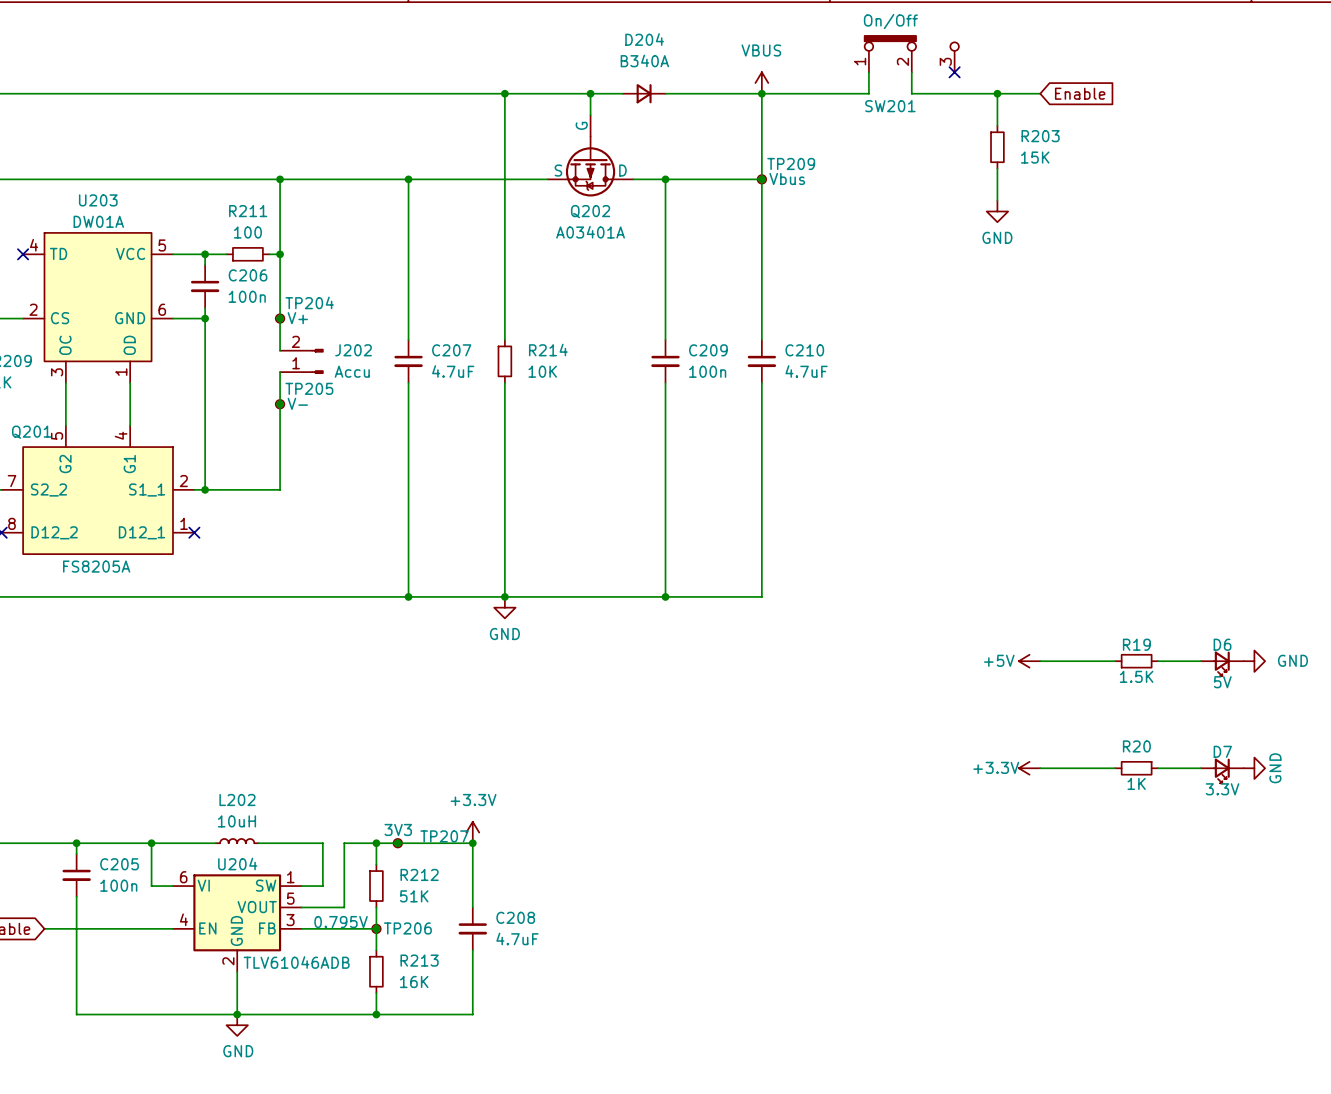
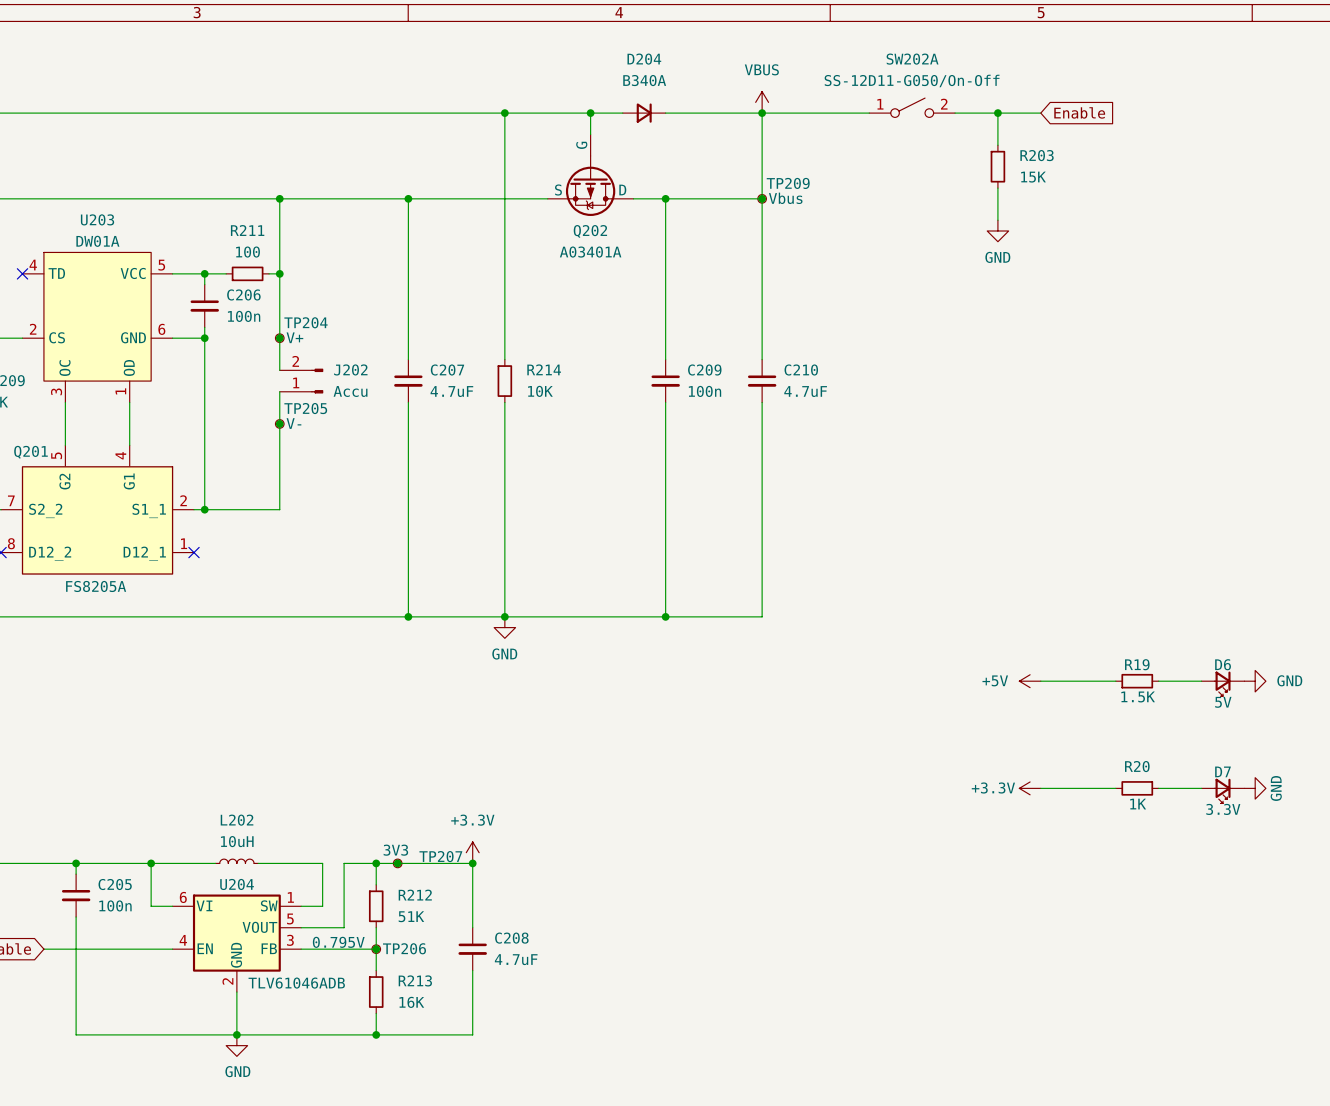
SW201: On/Off (911, 54) -> none
wire: (868, 72) (868, 93) -> none
wire: (911, 72) (911, 93) (954, 93) -> none
no-connect mark: (954, 72) -> none
SW202A: none -> SS-12D11-G050/On-Off (912, 107)

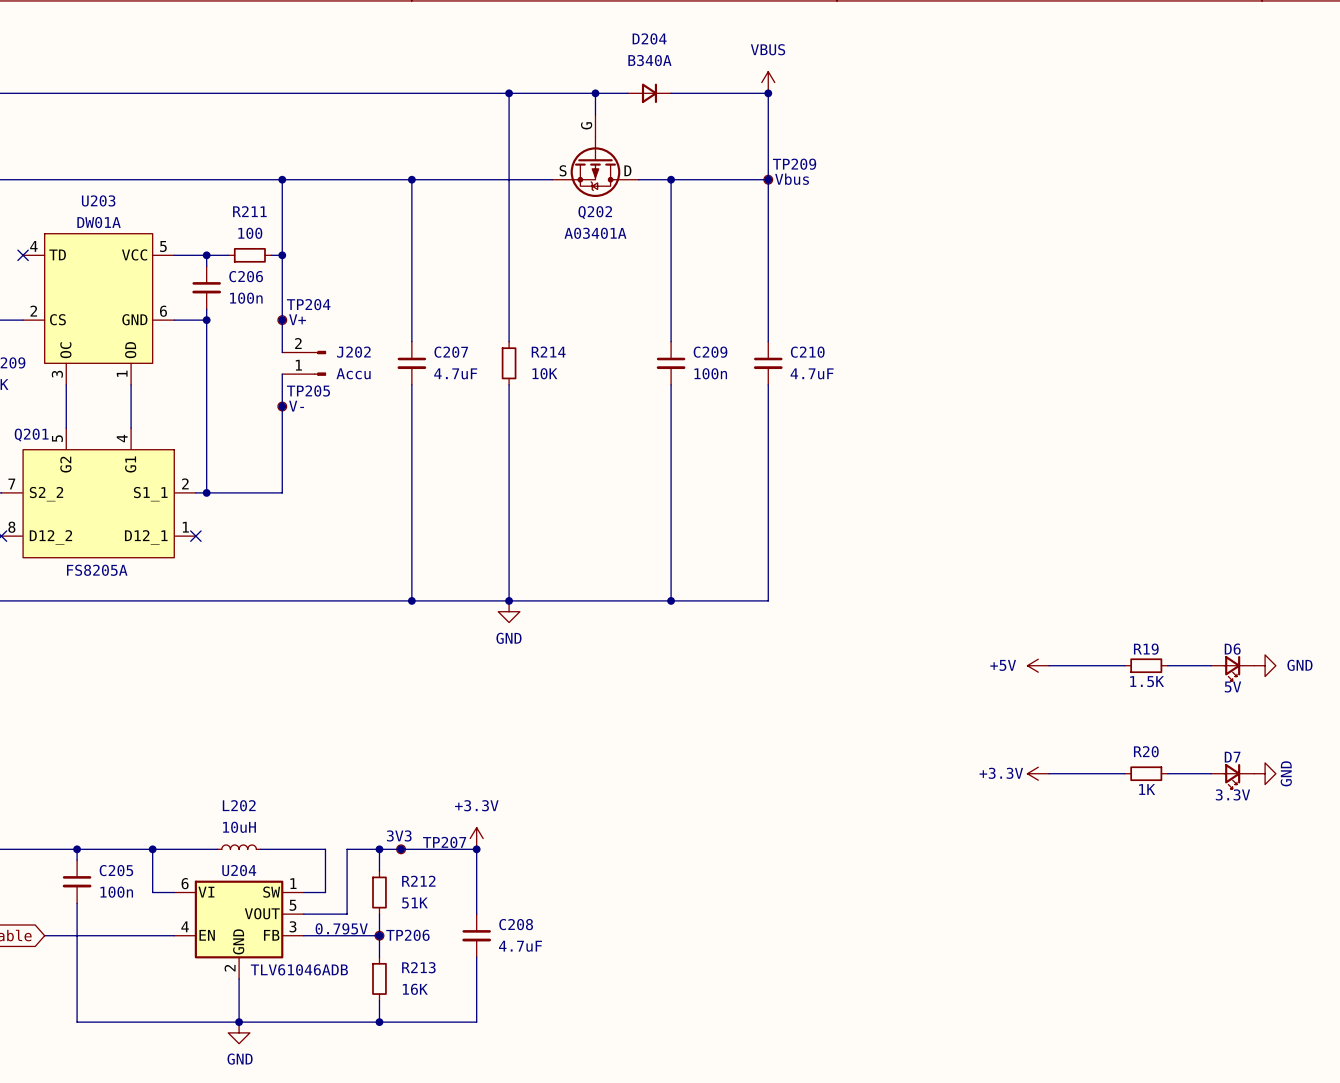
SW202A: SS-12D11-G050/On-Off (912, 107) -> none
global label: Enable (1079, 112) -> none
wire: (762, 113) (869, 113) -> none
wire: (955, 113) (1040, 113) -> none
wire: (997, 113) (997, 145) -> none
junction: (997, 113) -> none
R203: 15K (997, 166) -> none
wire: (997, 188) (997, 220) -> none
power symbol: GND (997, 231) -> none

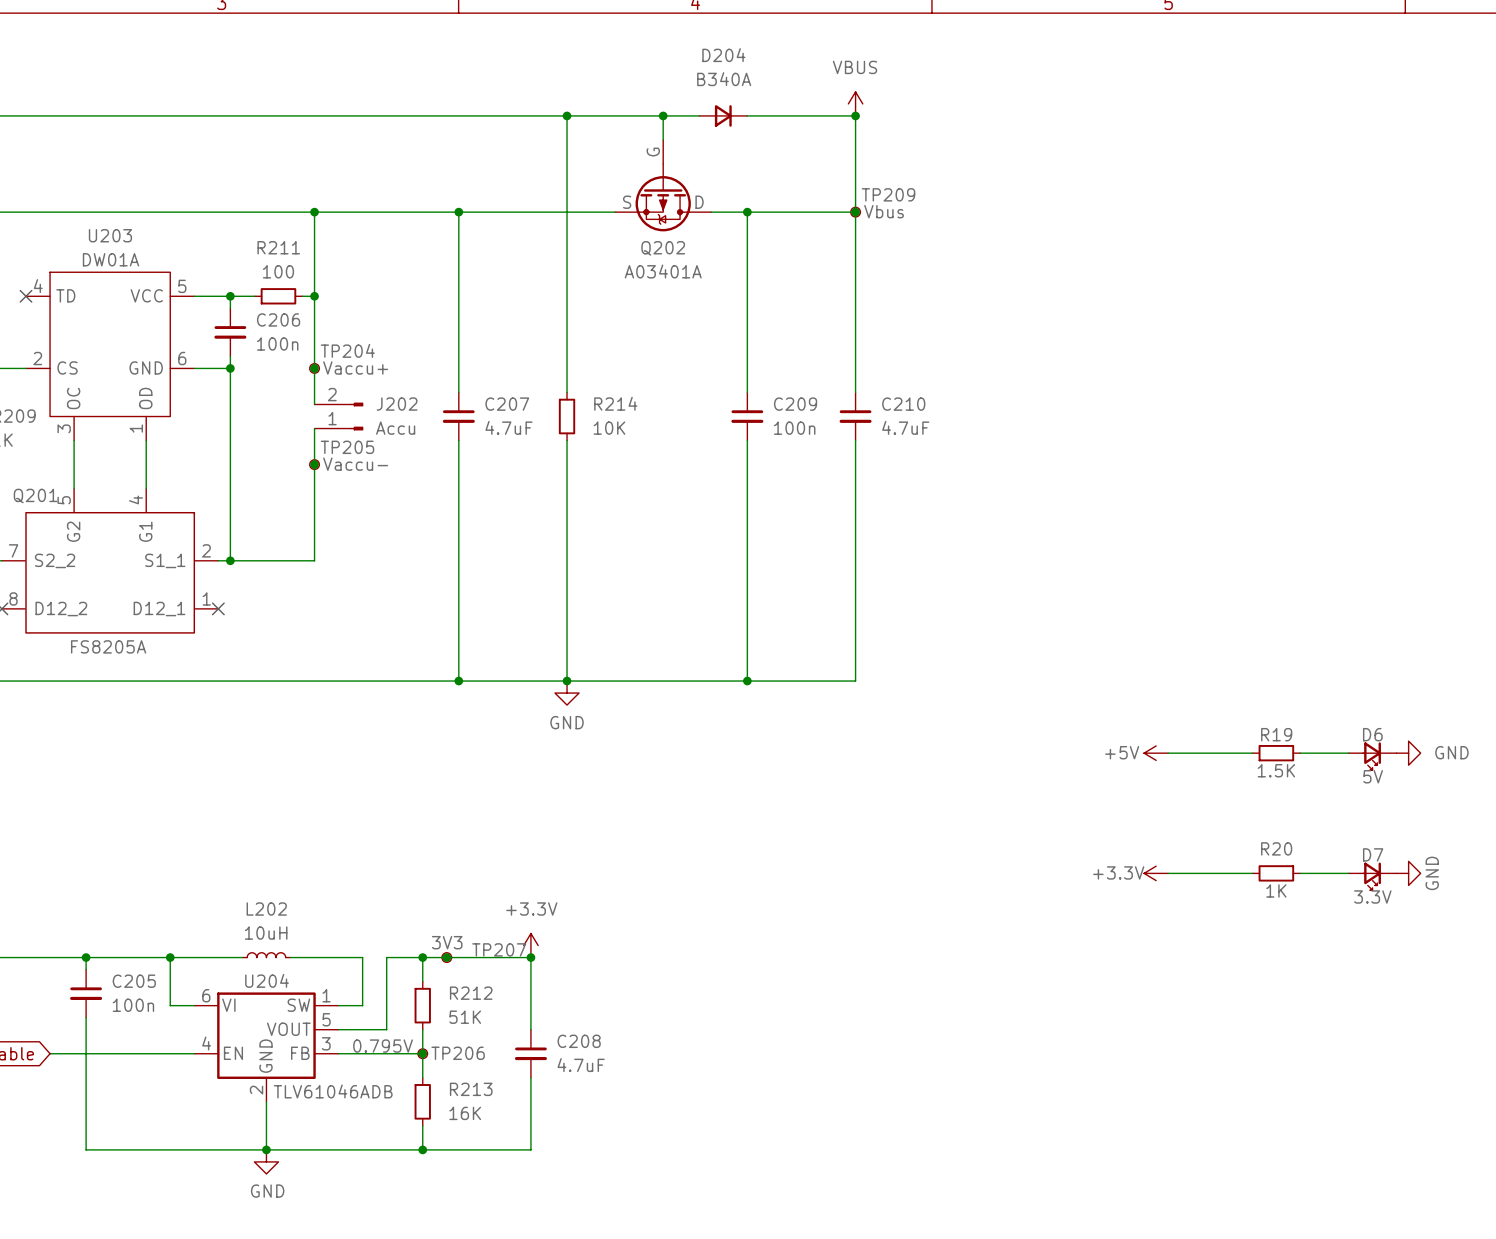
TP204 value: V+ (297, 319) -> Vaccu+ (355, 367)
TP205 value: V- (296, 406) -> Vaccu- (355, 464)

